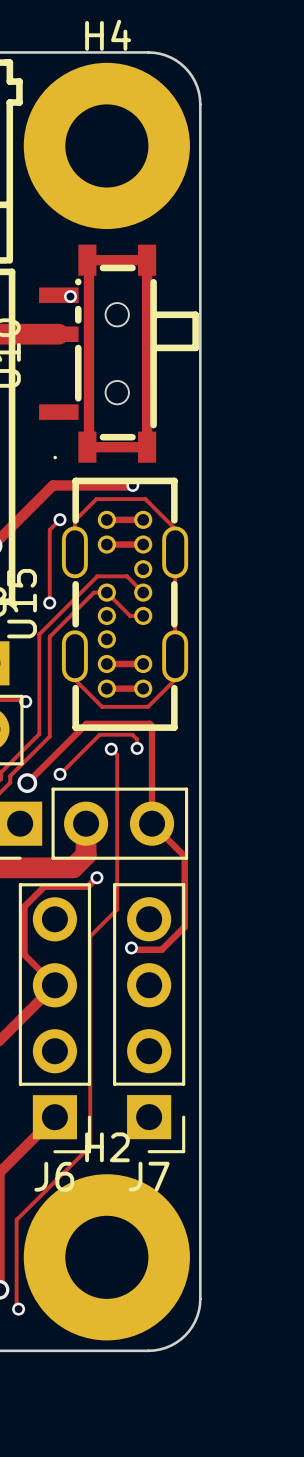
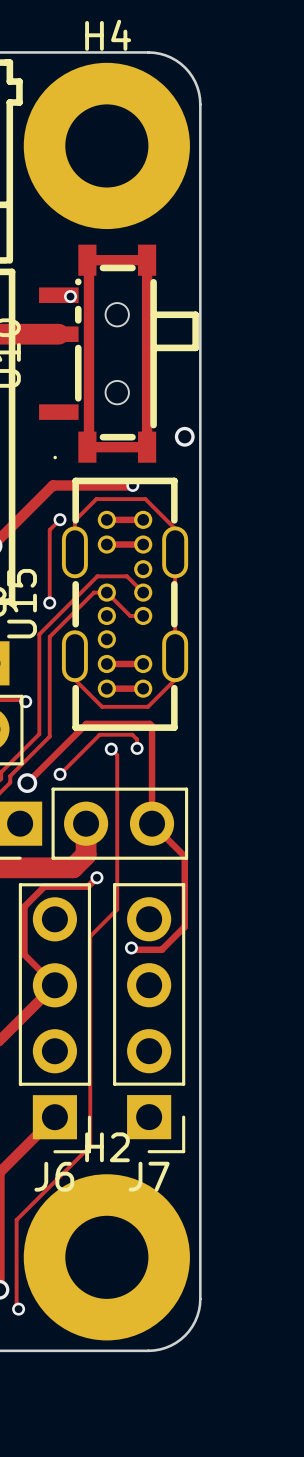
via: none -> (184, 436)

